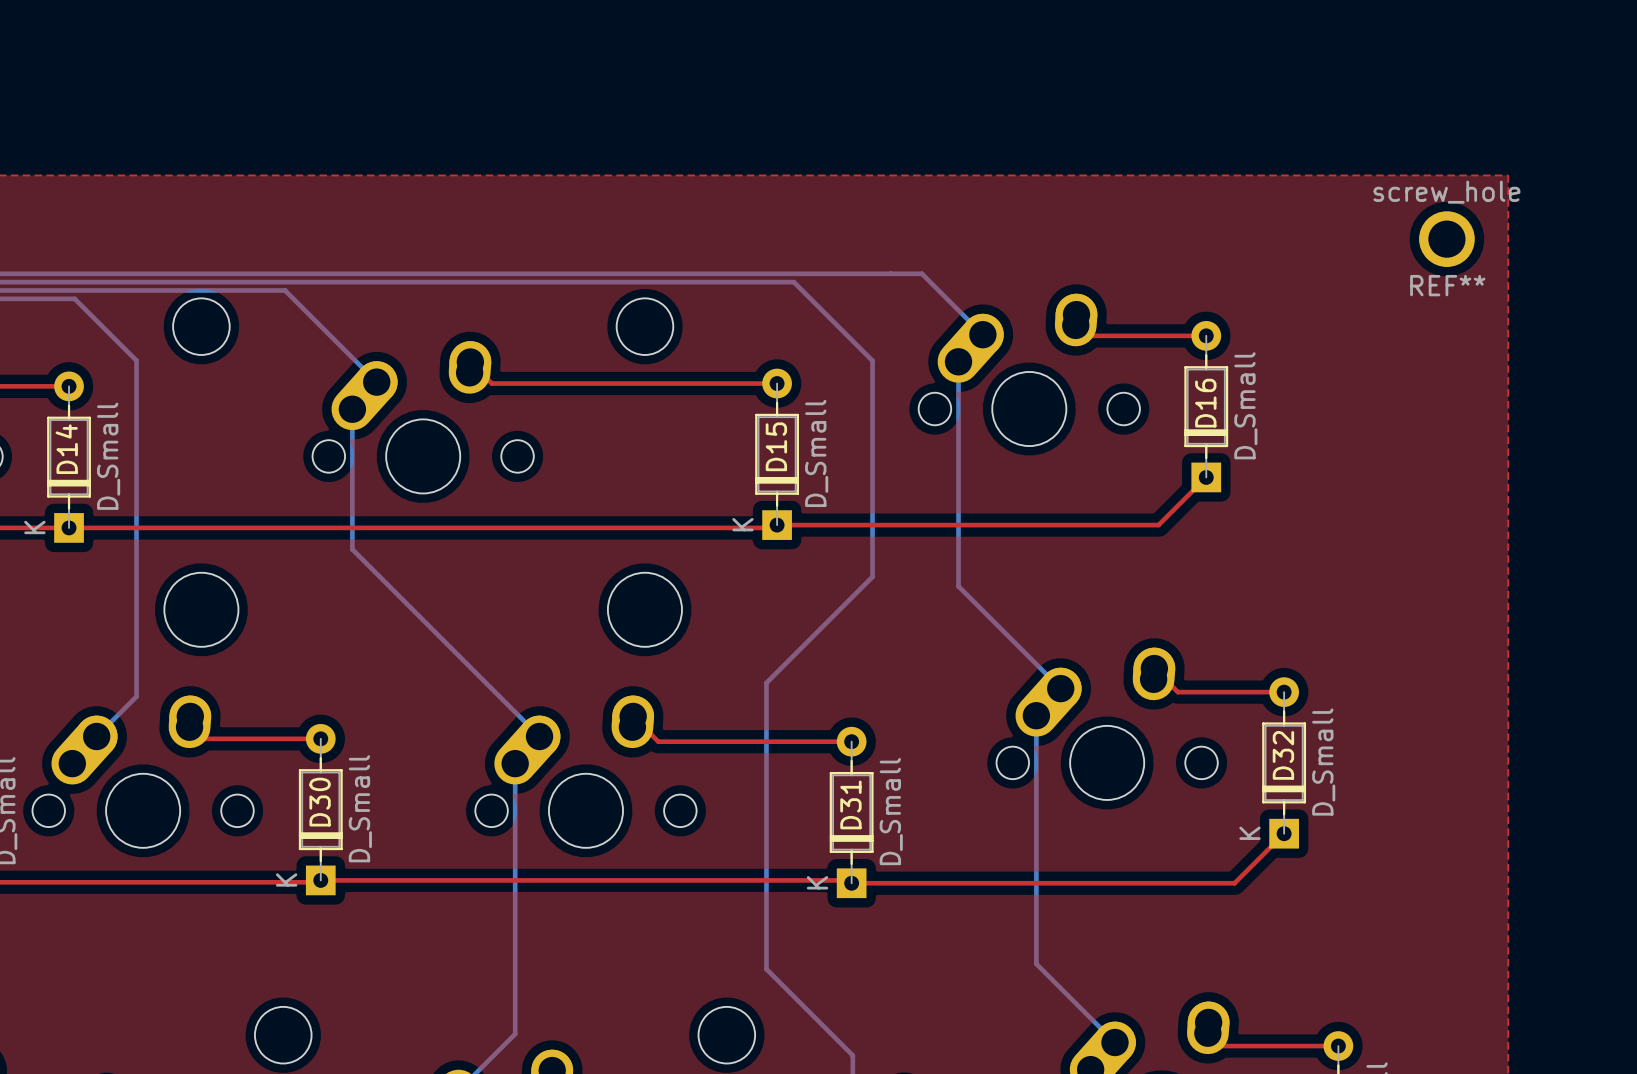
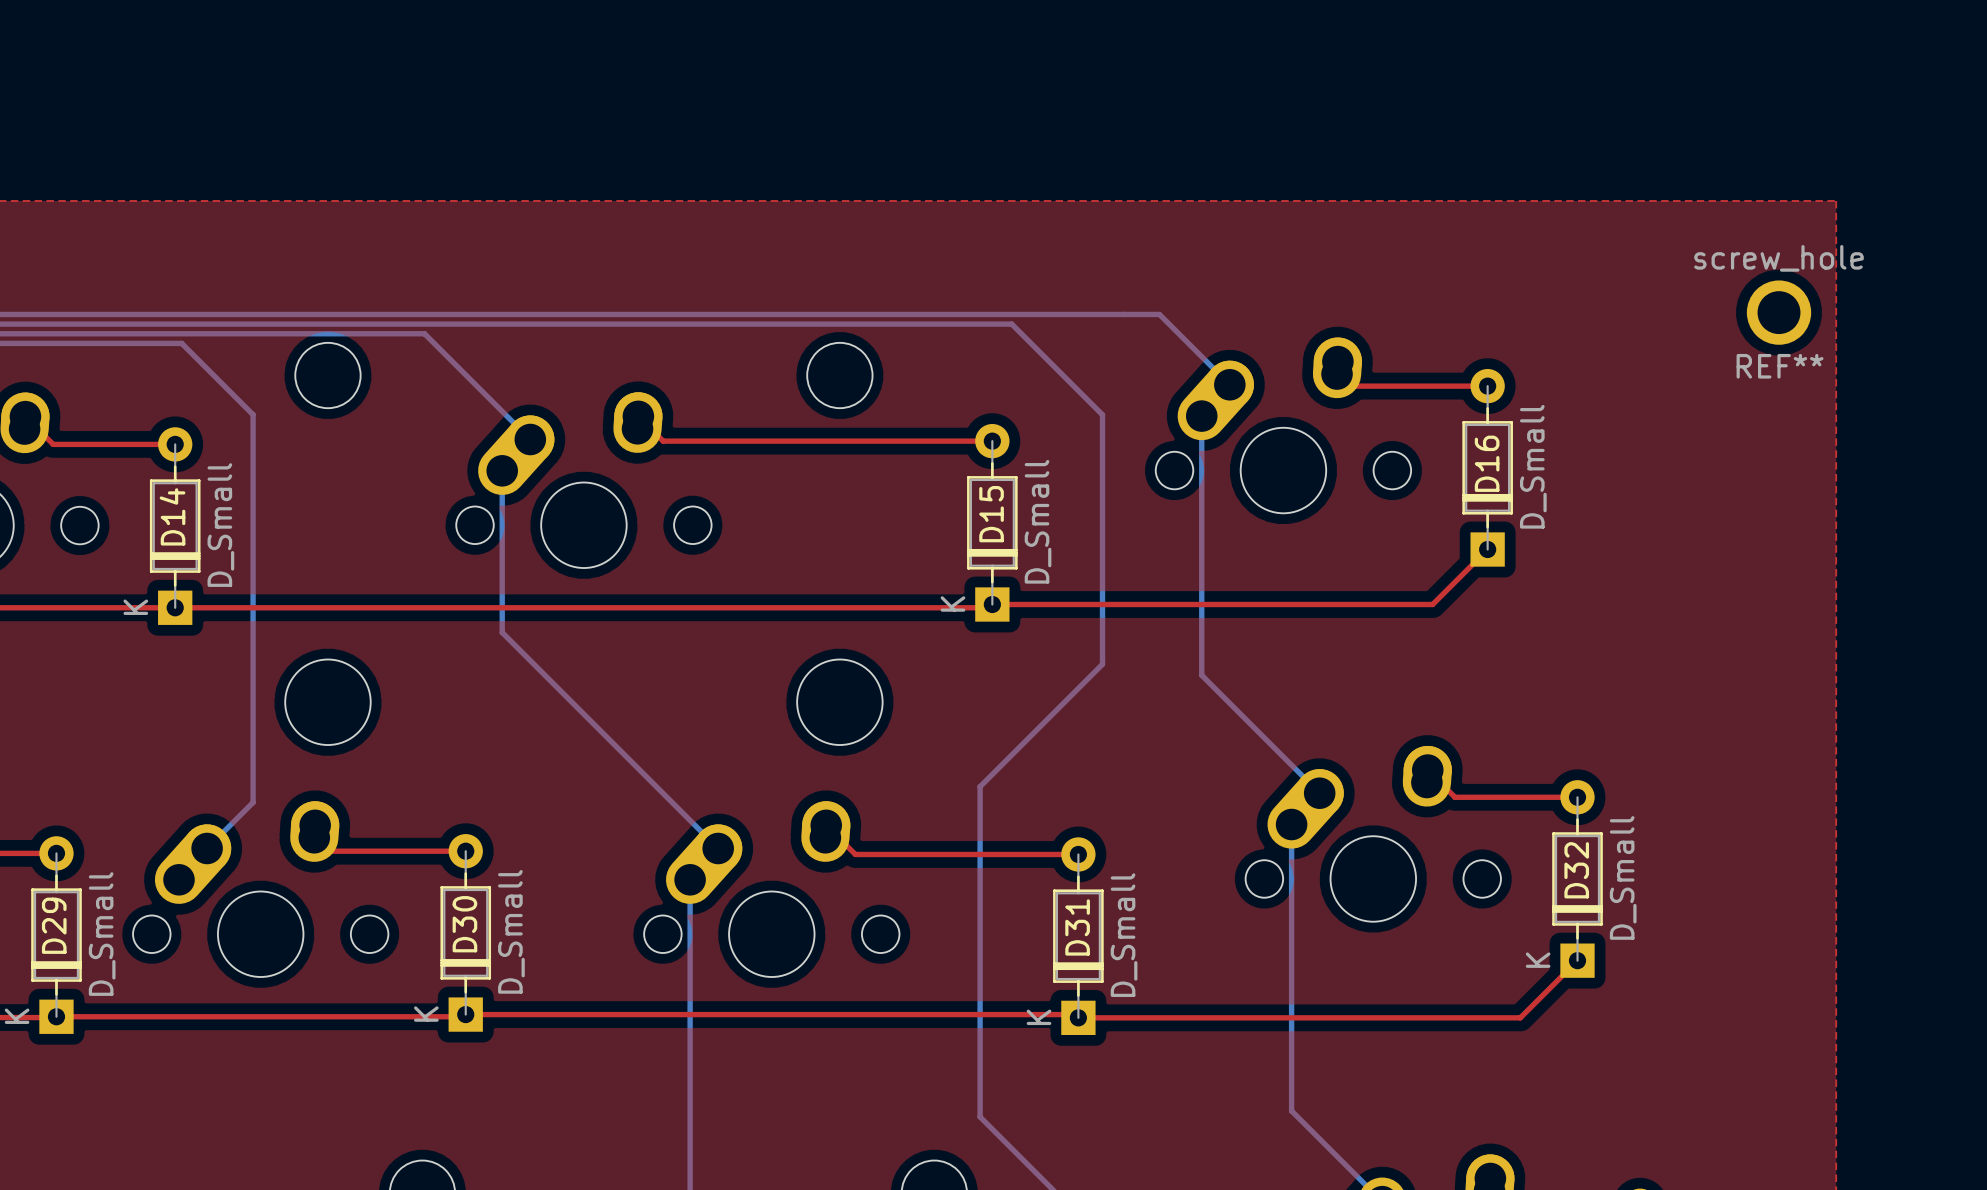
REF** position: (1446, 239) -> (1779, 312)

